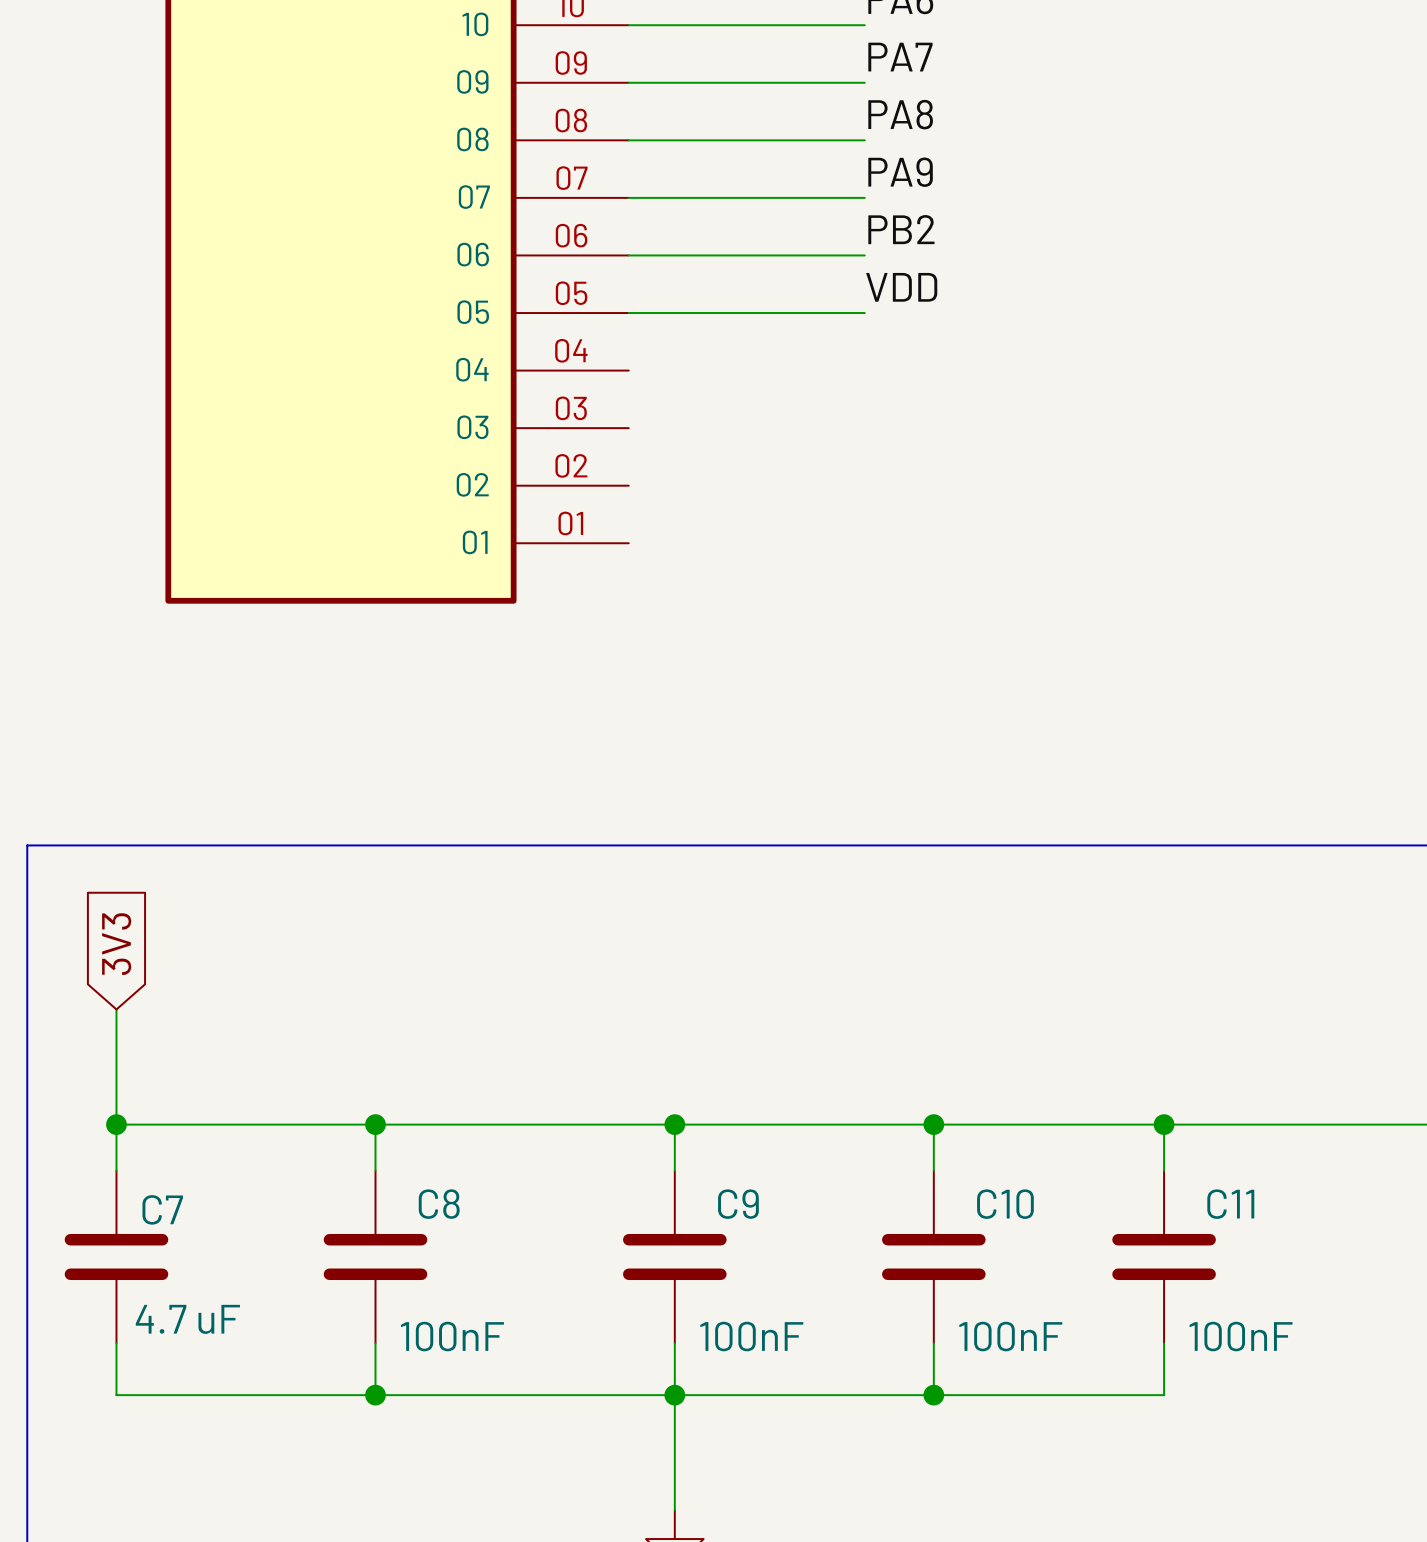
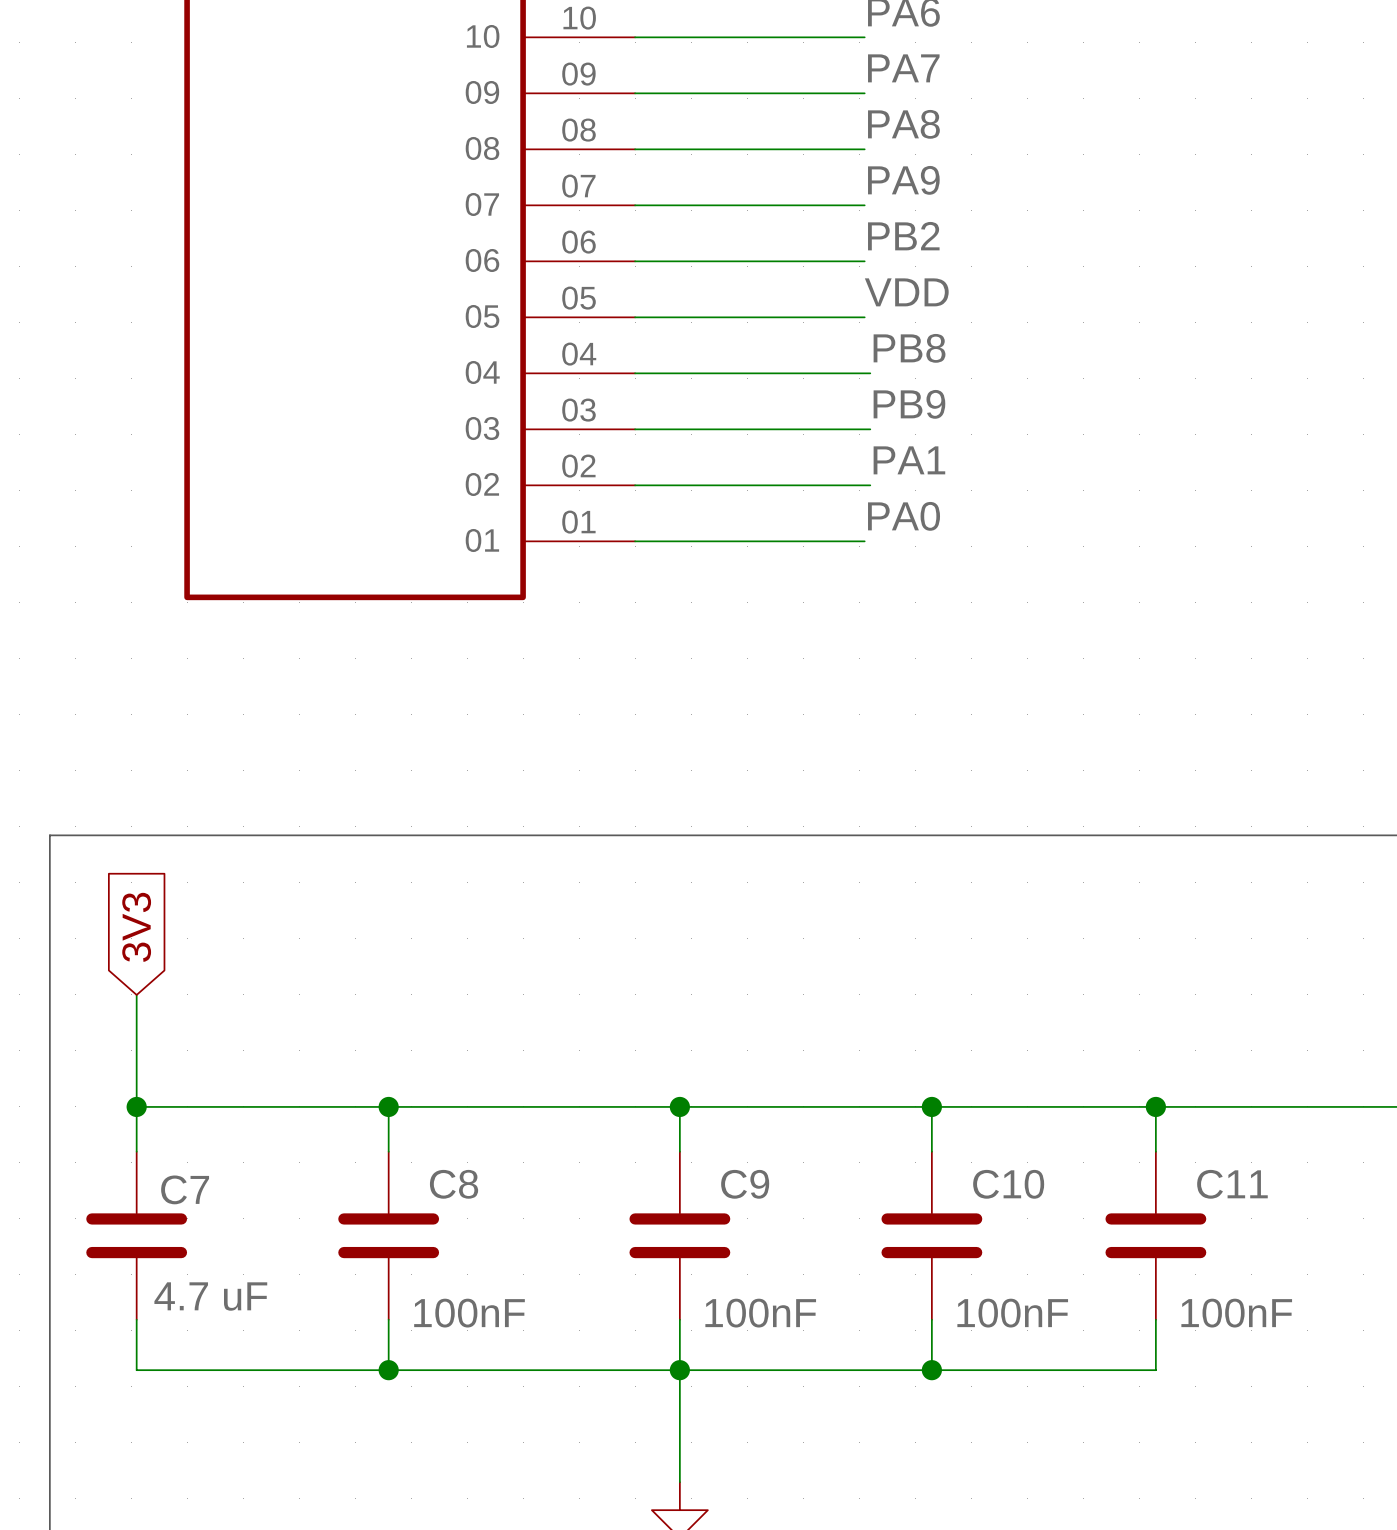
label: none -> PB8 (909, 348)
wire: none -> (635, 373) (870, 373)
label: none -> PB9 (909, 404)
wire: none -> (635, 429) (870, 429)
label: none -> PA1 (909, 460)
wire: none -> (635, 485) (870, 485)
label: none -> PA0 (904, 516)
wire: none -> (635, 541) (864, 541)

